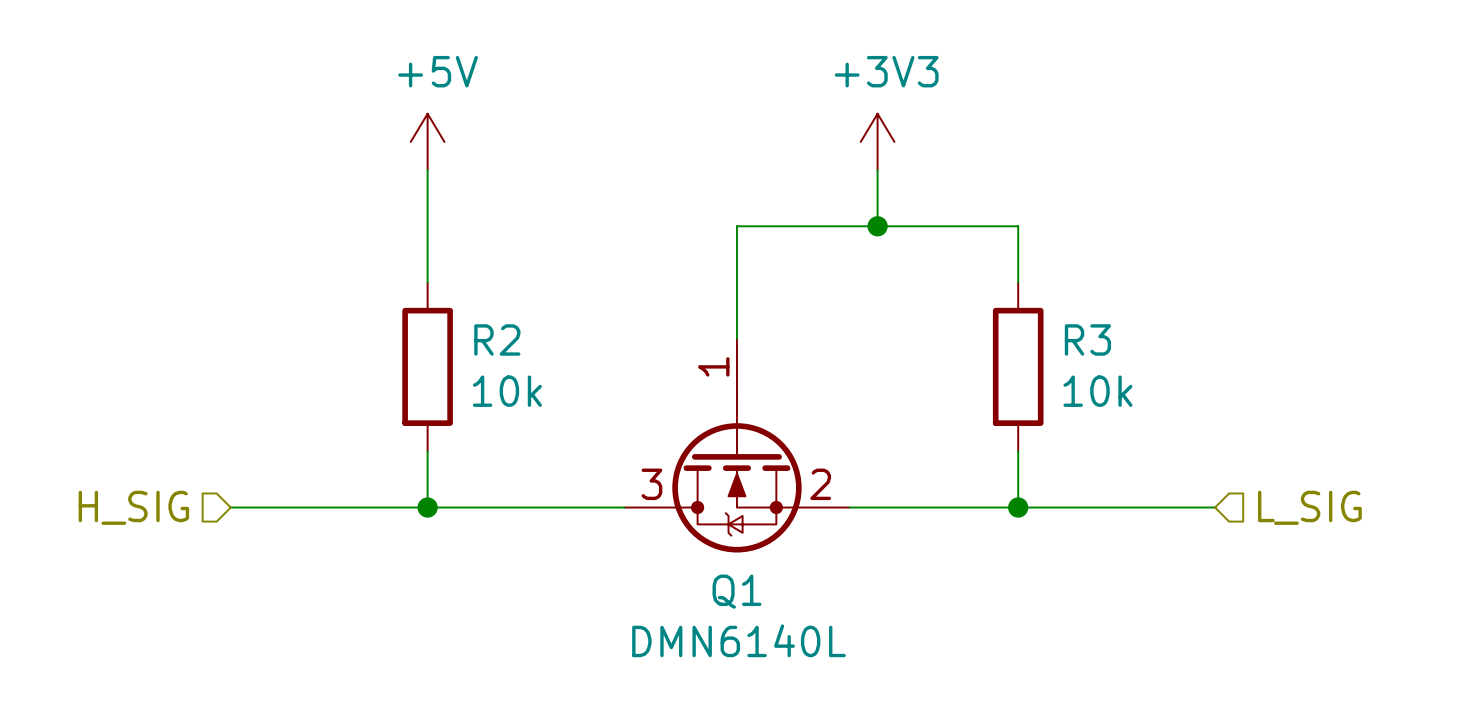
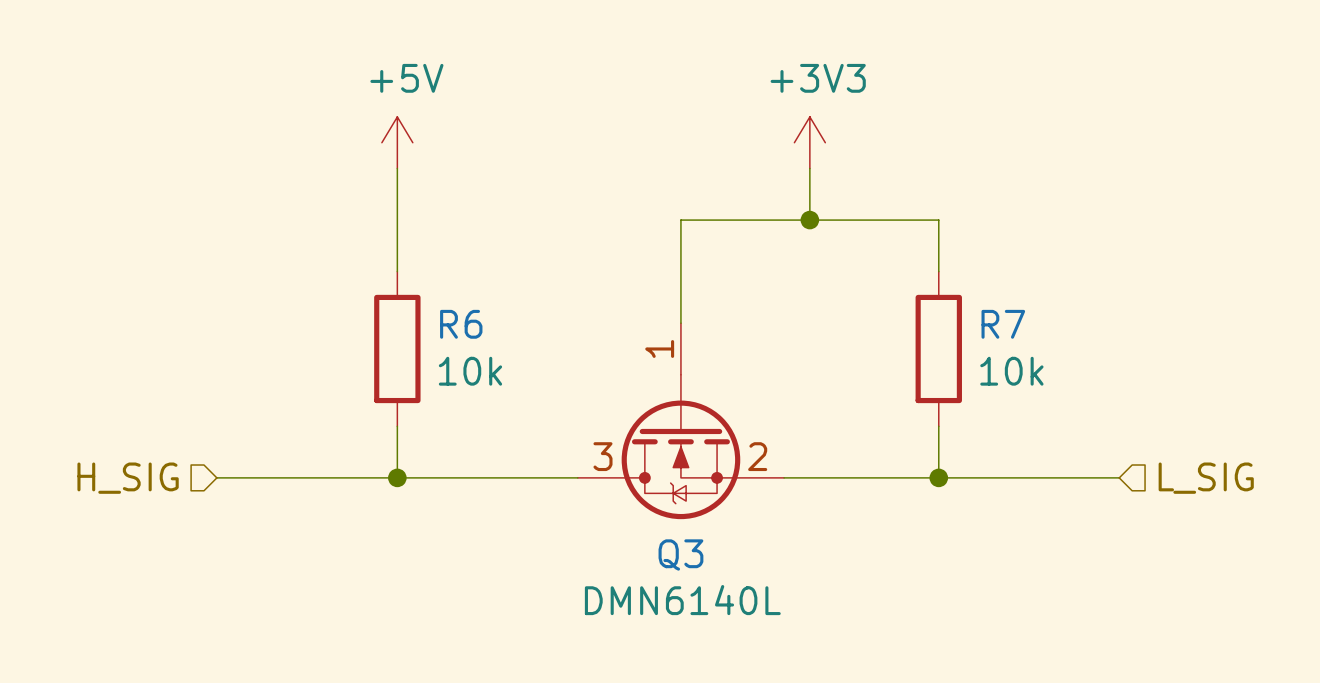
R2 name: R2 (497, 339) -> R6 (461, 324)
R3 name: R3 (1087, 339) -> R7 (1003, 324)
Q1 name: Q1 (736, 591) -> Q3 (680, 554)

